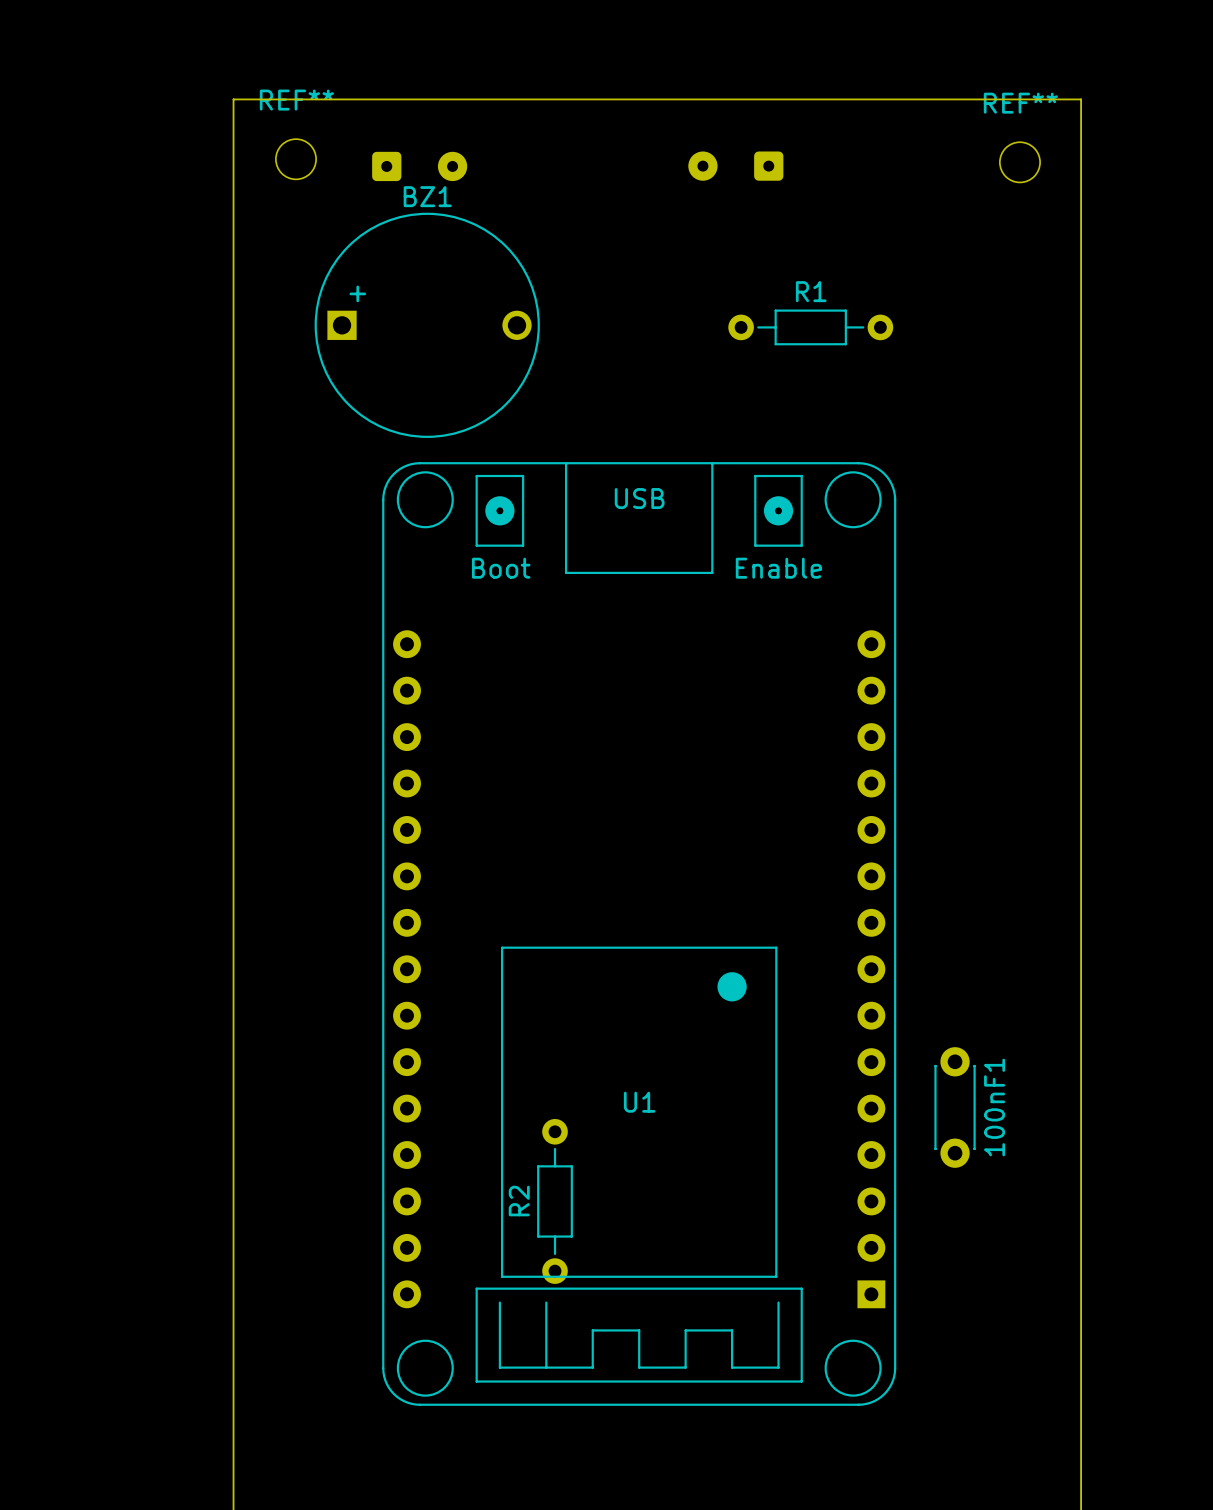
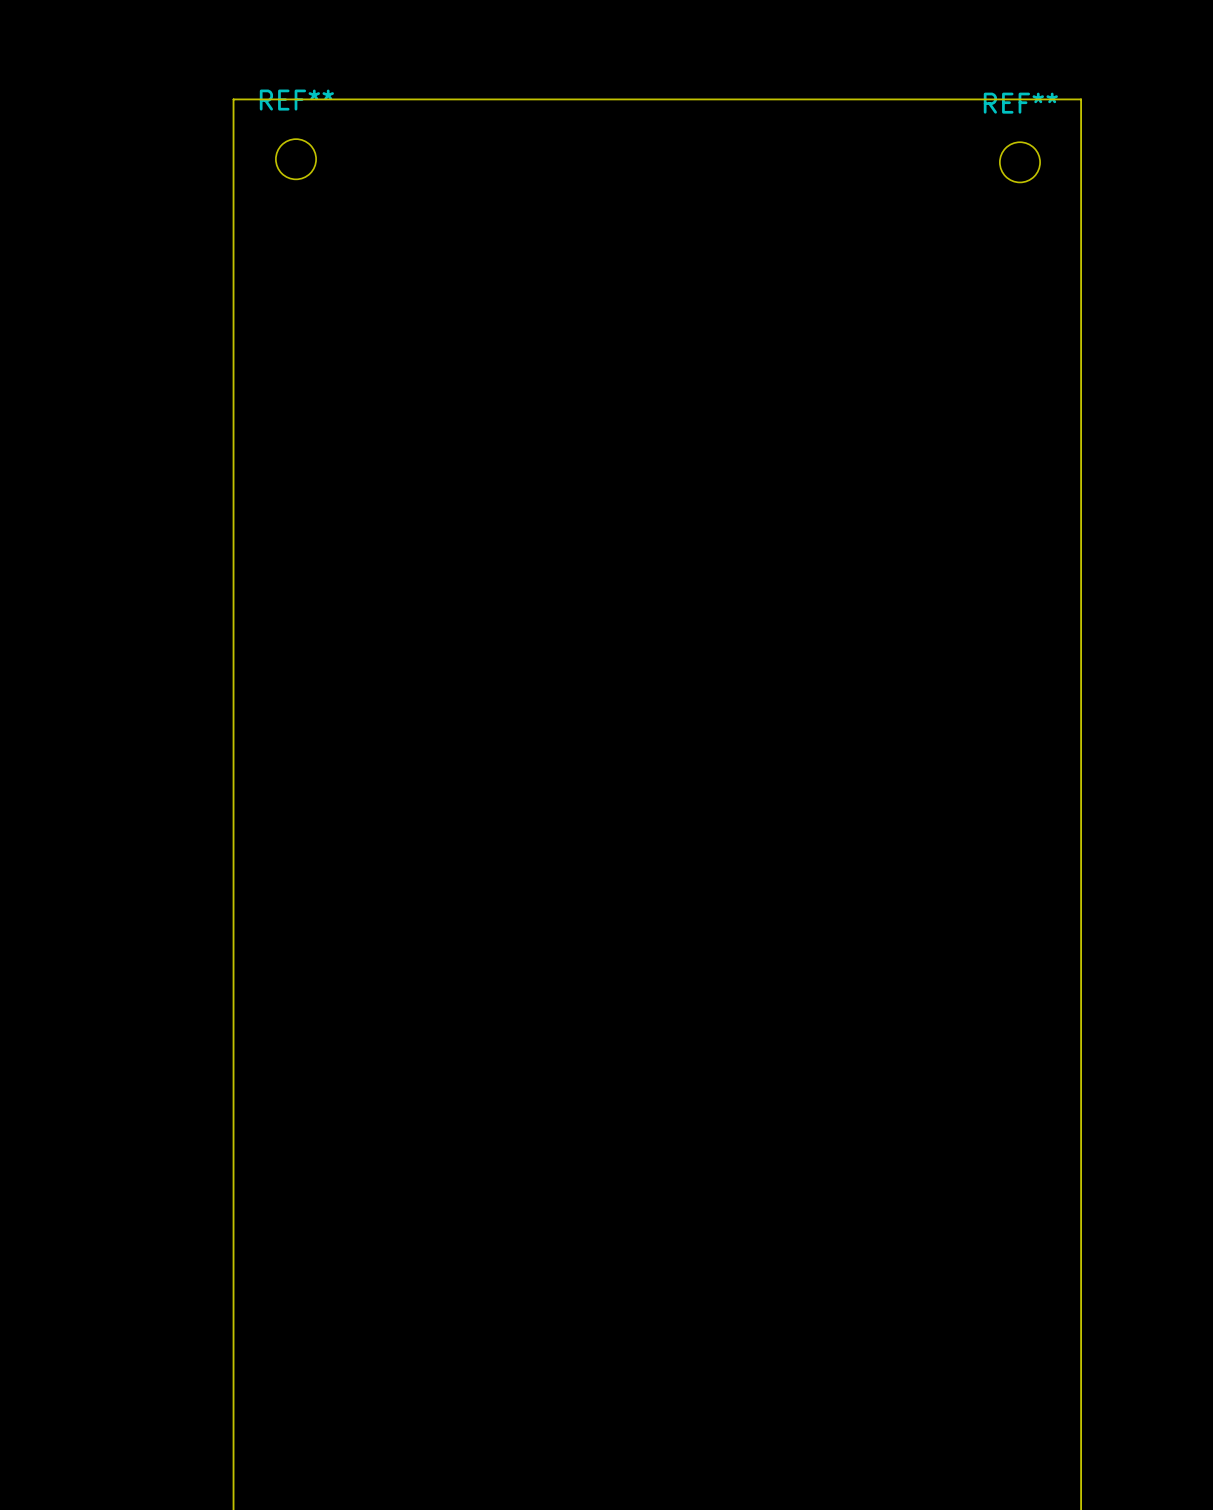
part: (419, 166) -> none
part: (735, 166) -> none
BZ1: (427, 325) -> none
R1: (810, 327) -> none
U1: (639, 933) -> none
100nF1: (955, 1107) -> none
R2: (555, 1201) -> none

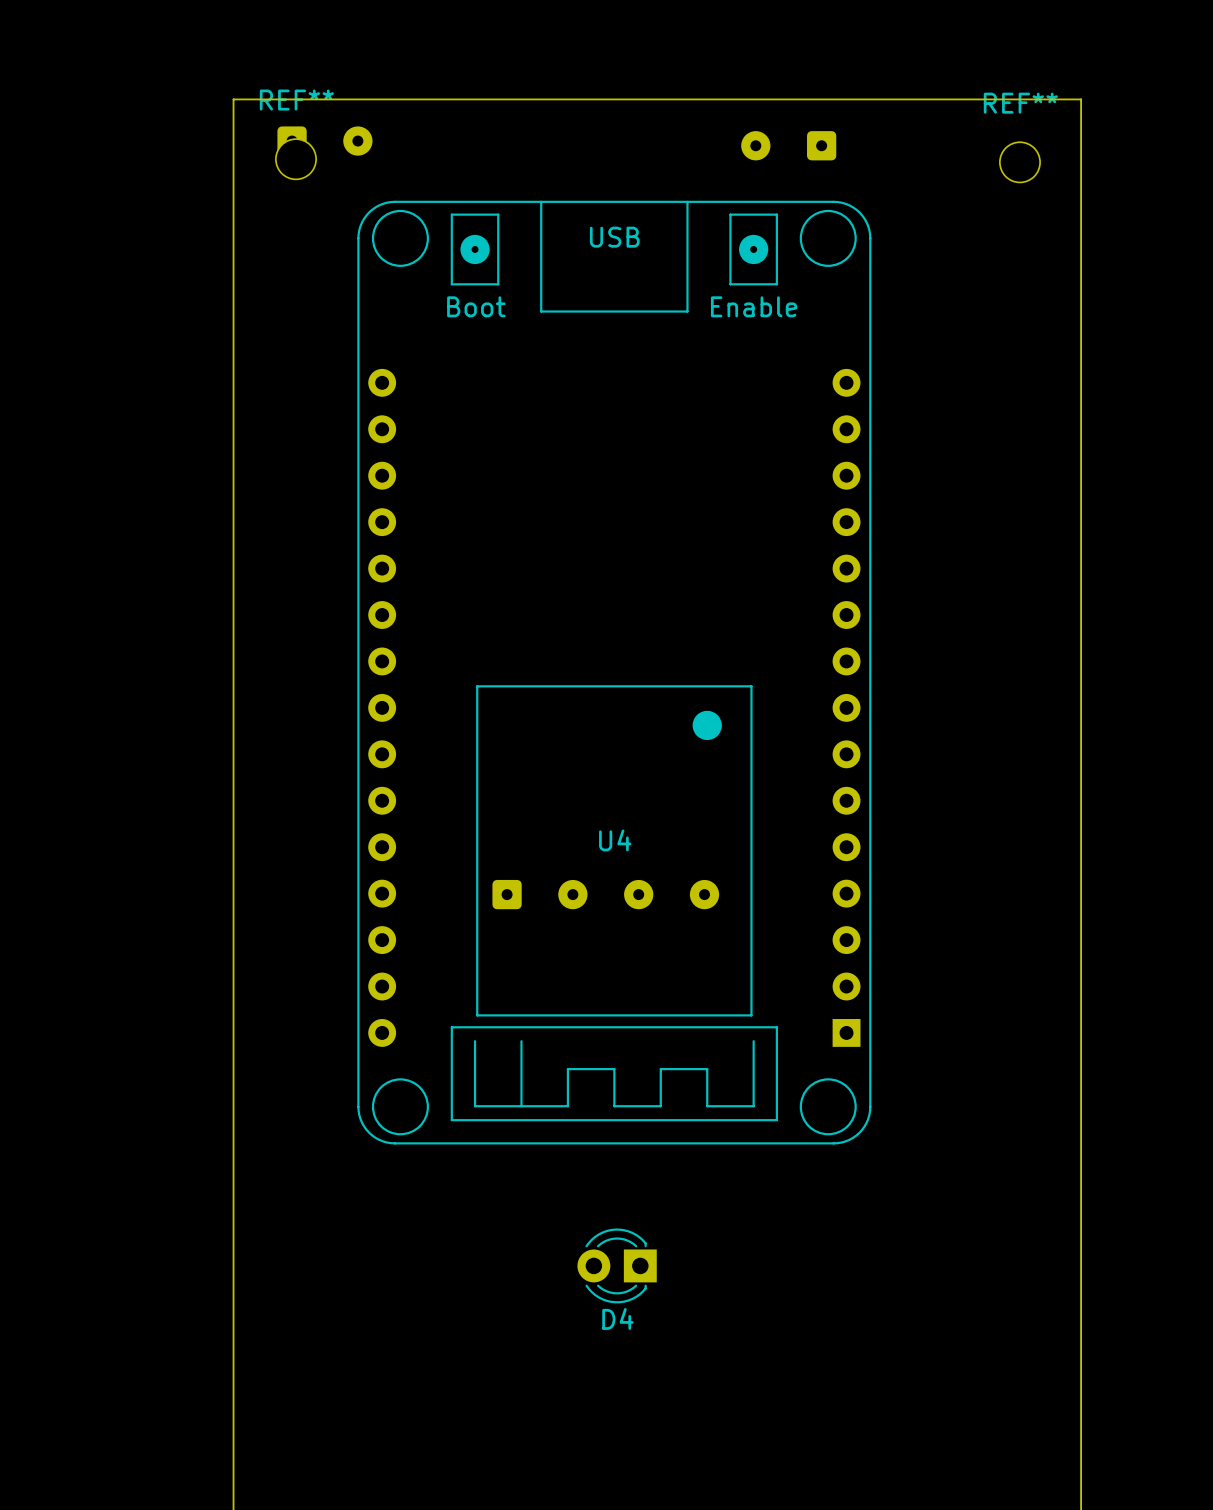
part: none -> (324, 141)
part: none -> (788, 145)
U4: none -> (614, 672)
part: none -> (605, 894)
D4: none -> (617, 1265)

